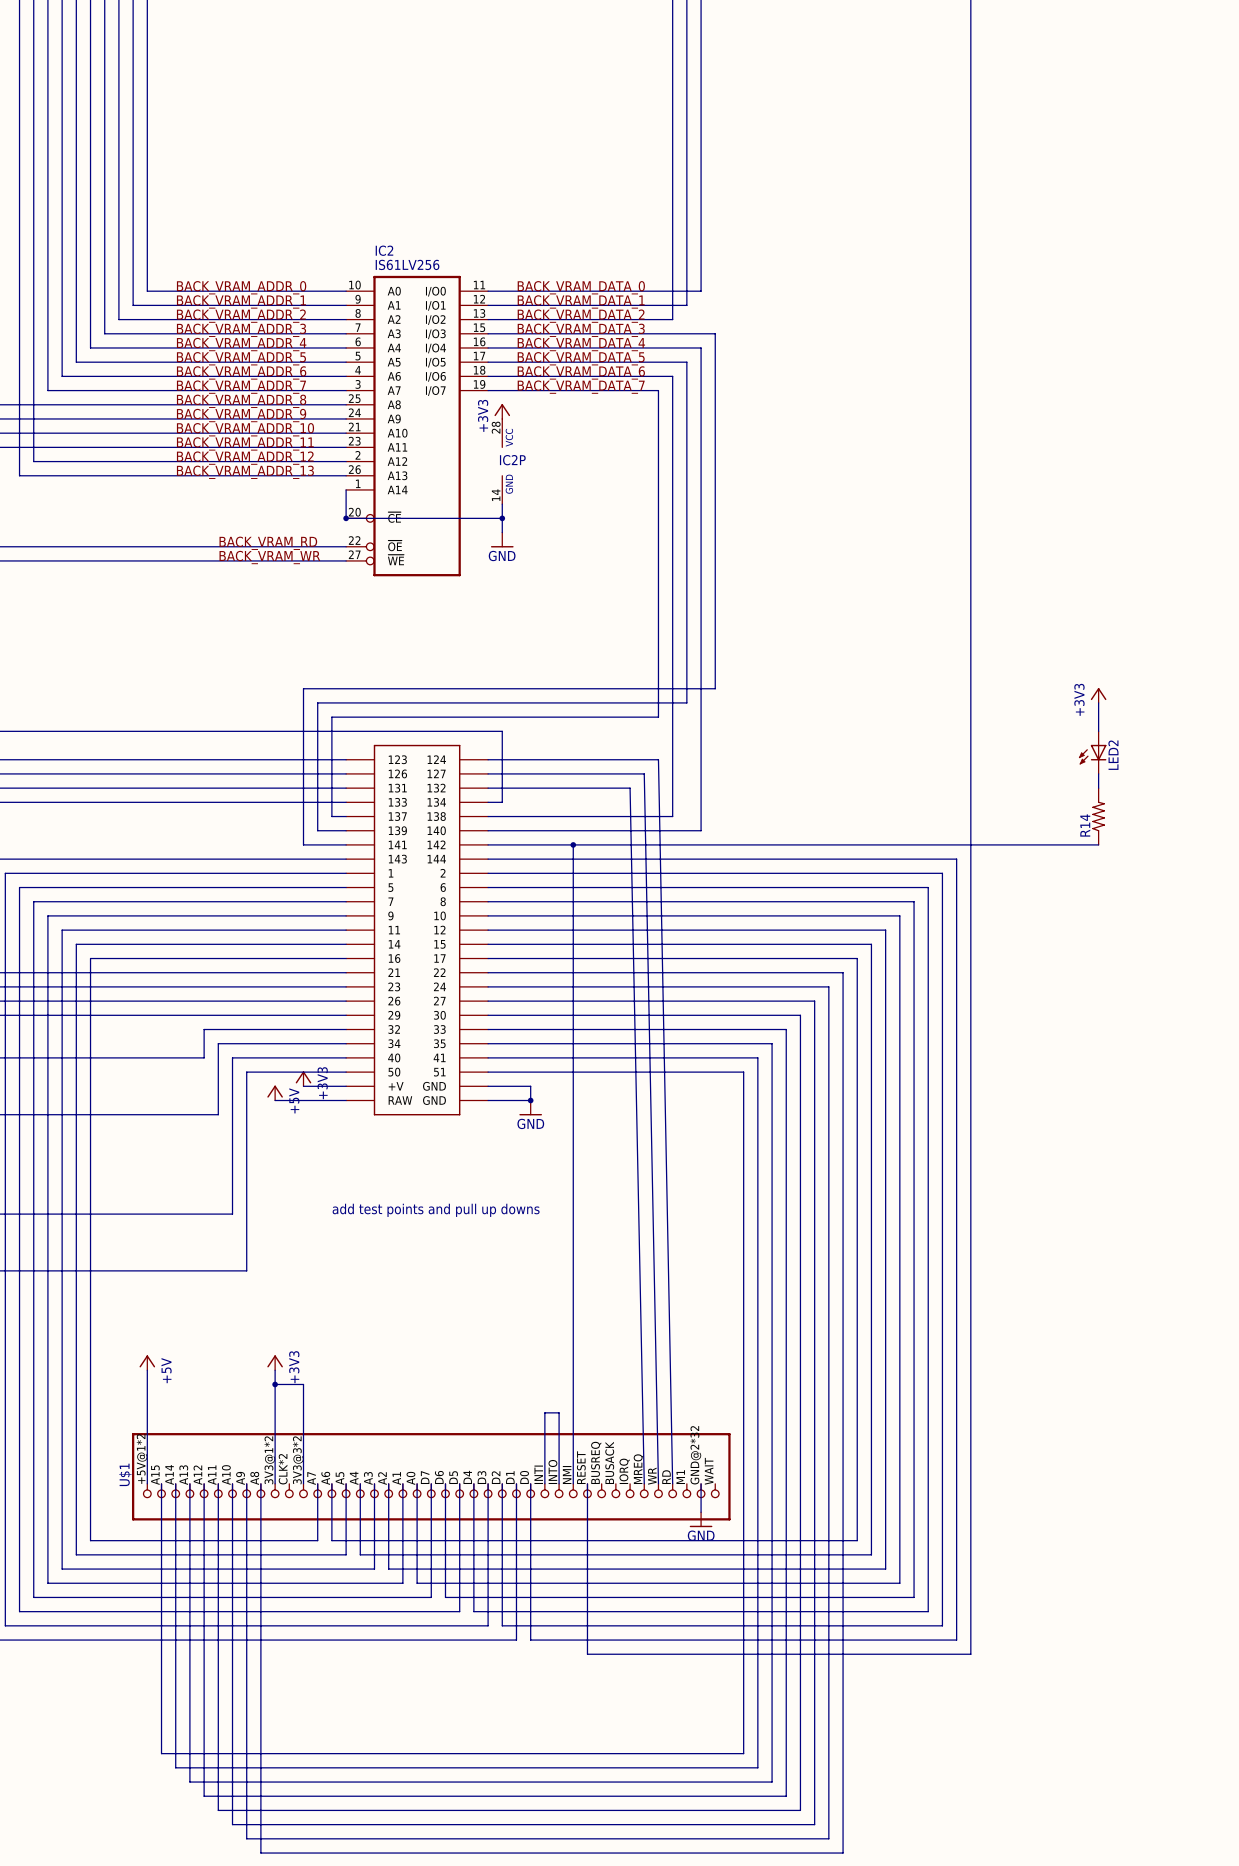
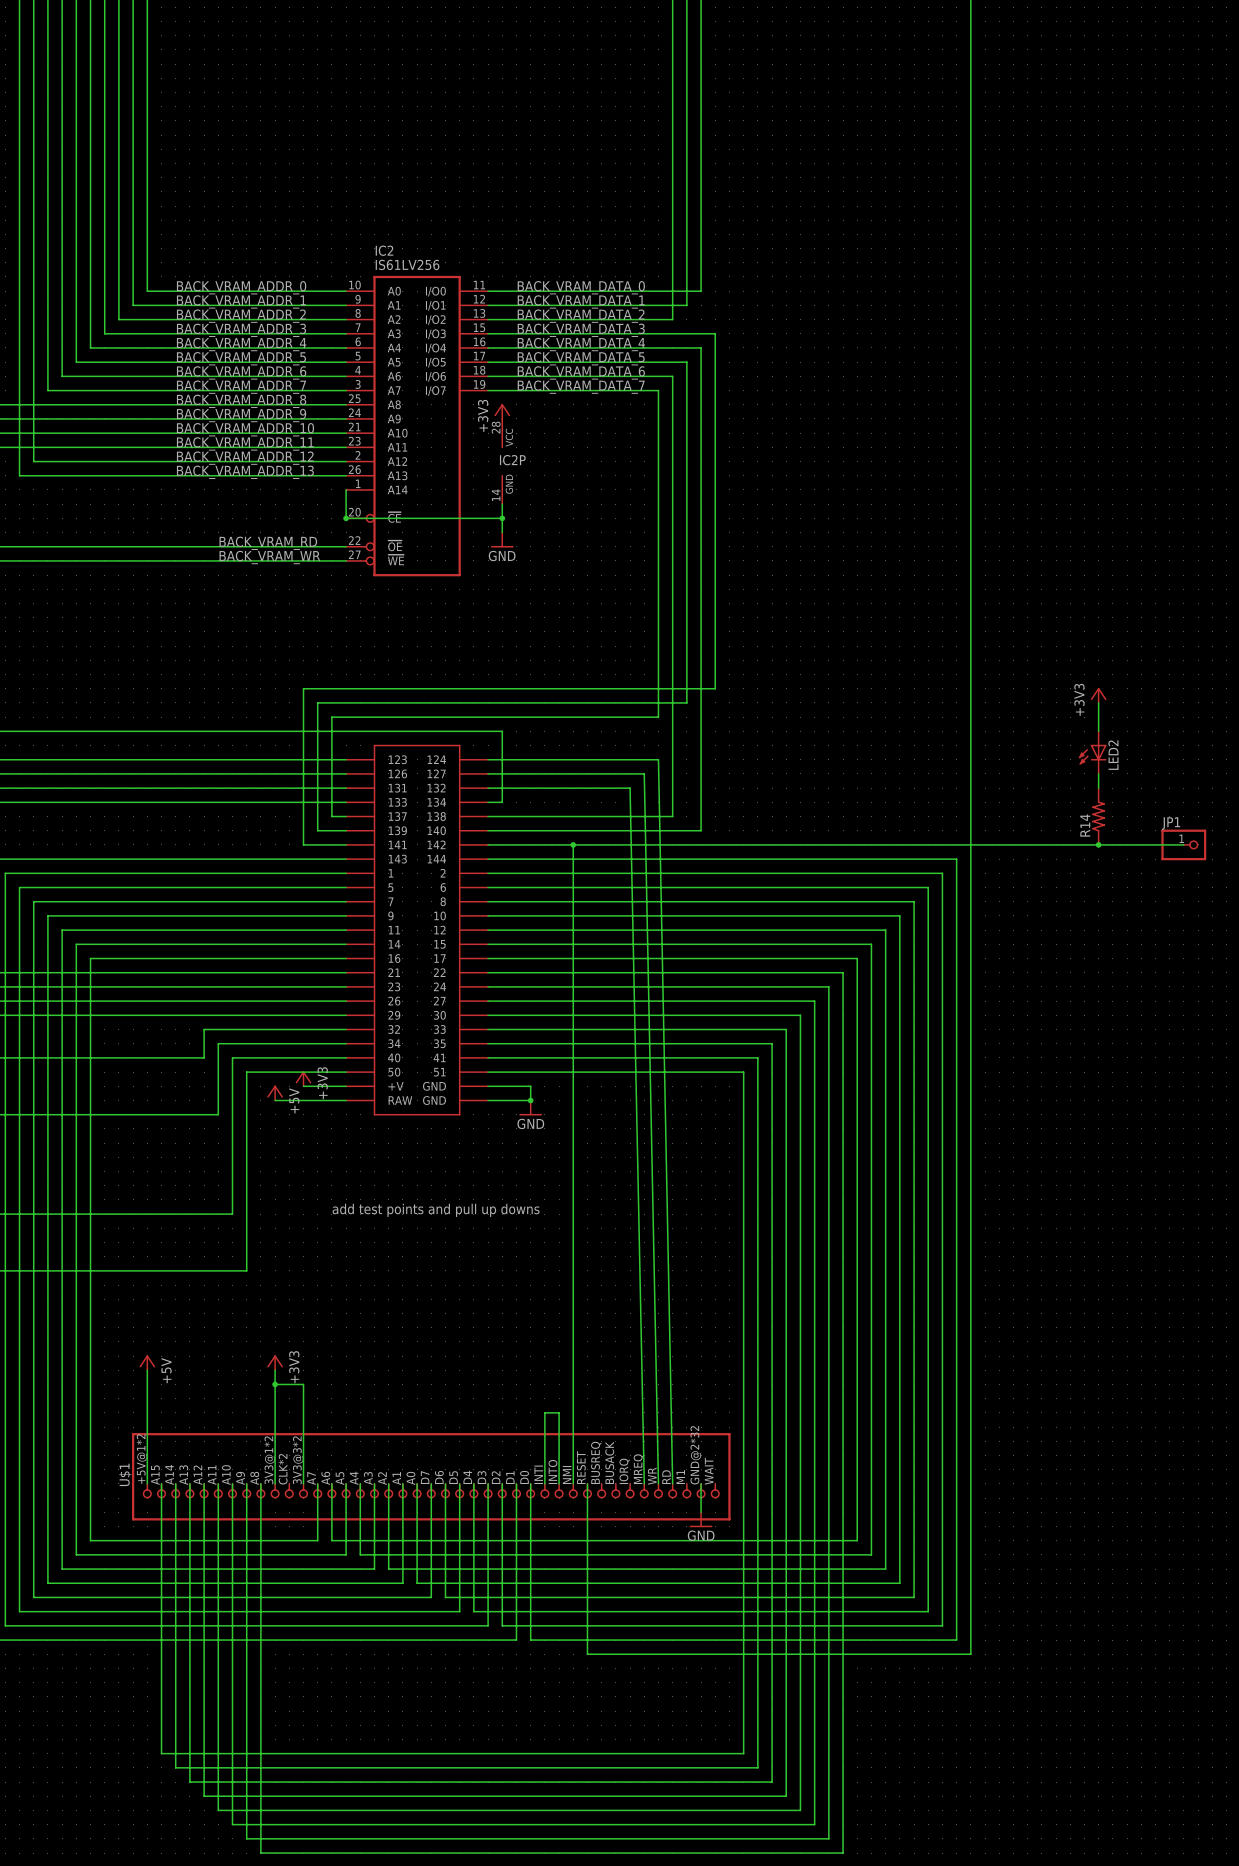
wire: none -> (1098, 844) (1183, 844)
junction: none -> (1098, 844)
JP1: none -> (1183, 844)

